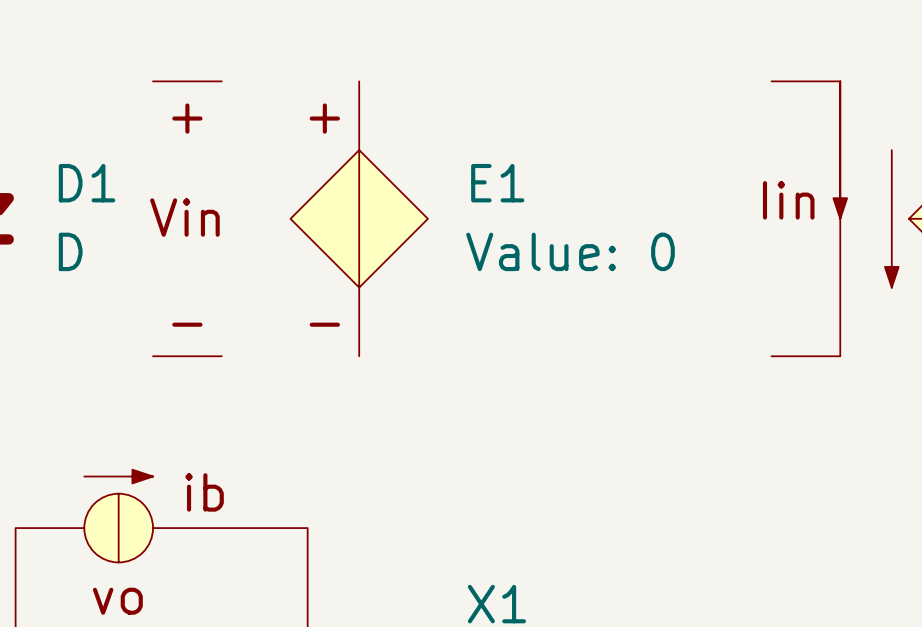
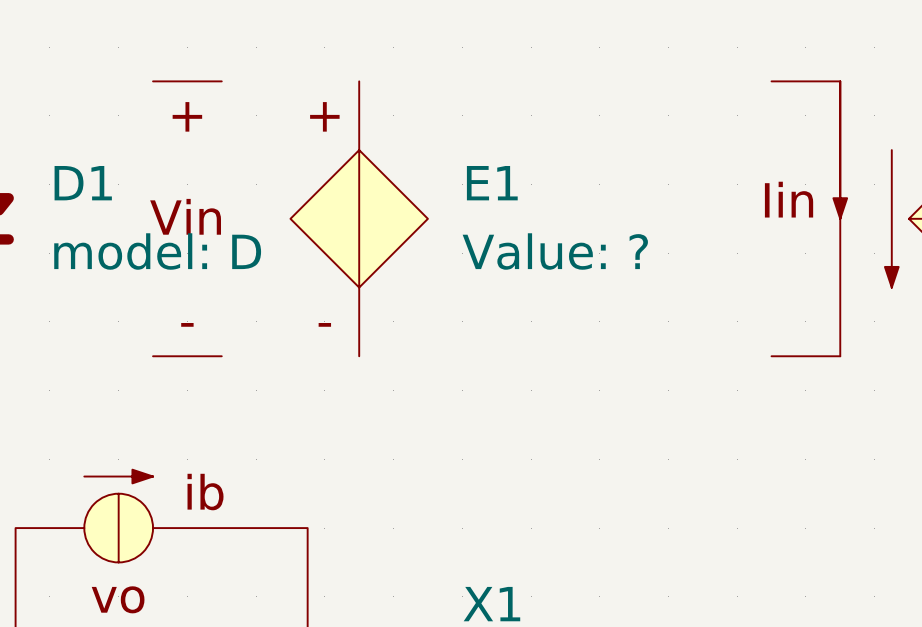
D1 text: D (70, 251) -> model: D (157, 251)
E1 value: Value: 0 (570, 251) -> Value: ? (555, 251)

